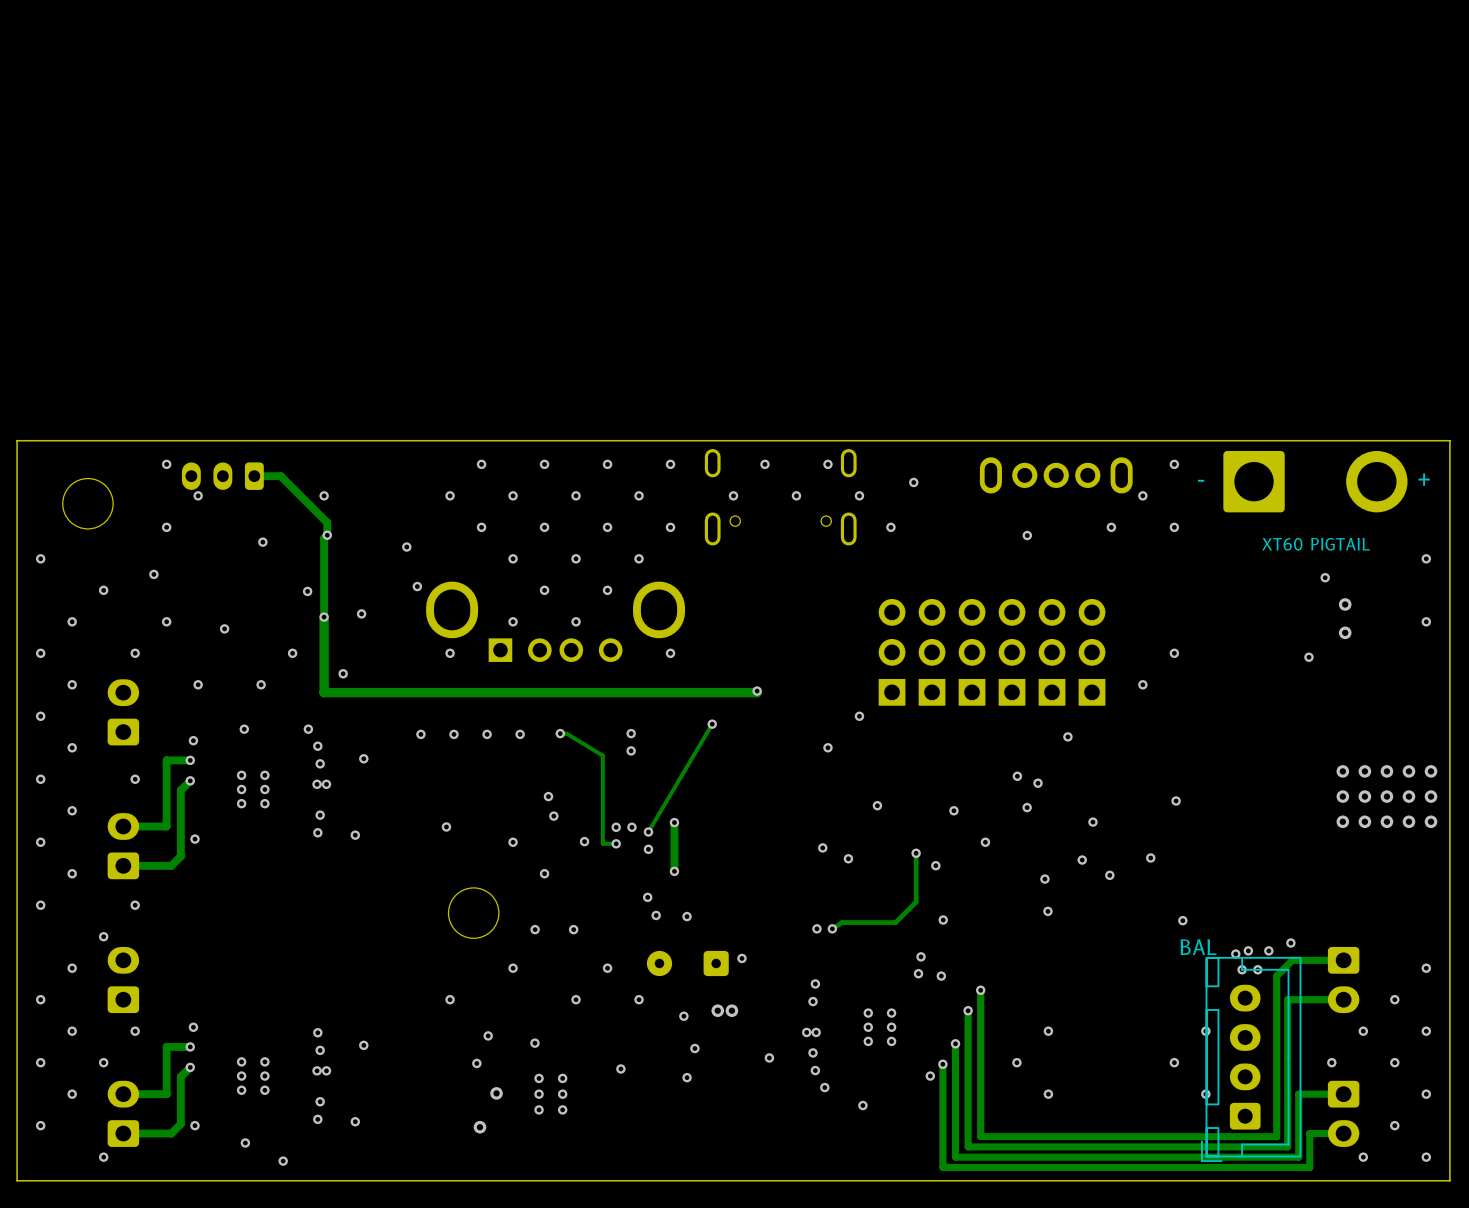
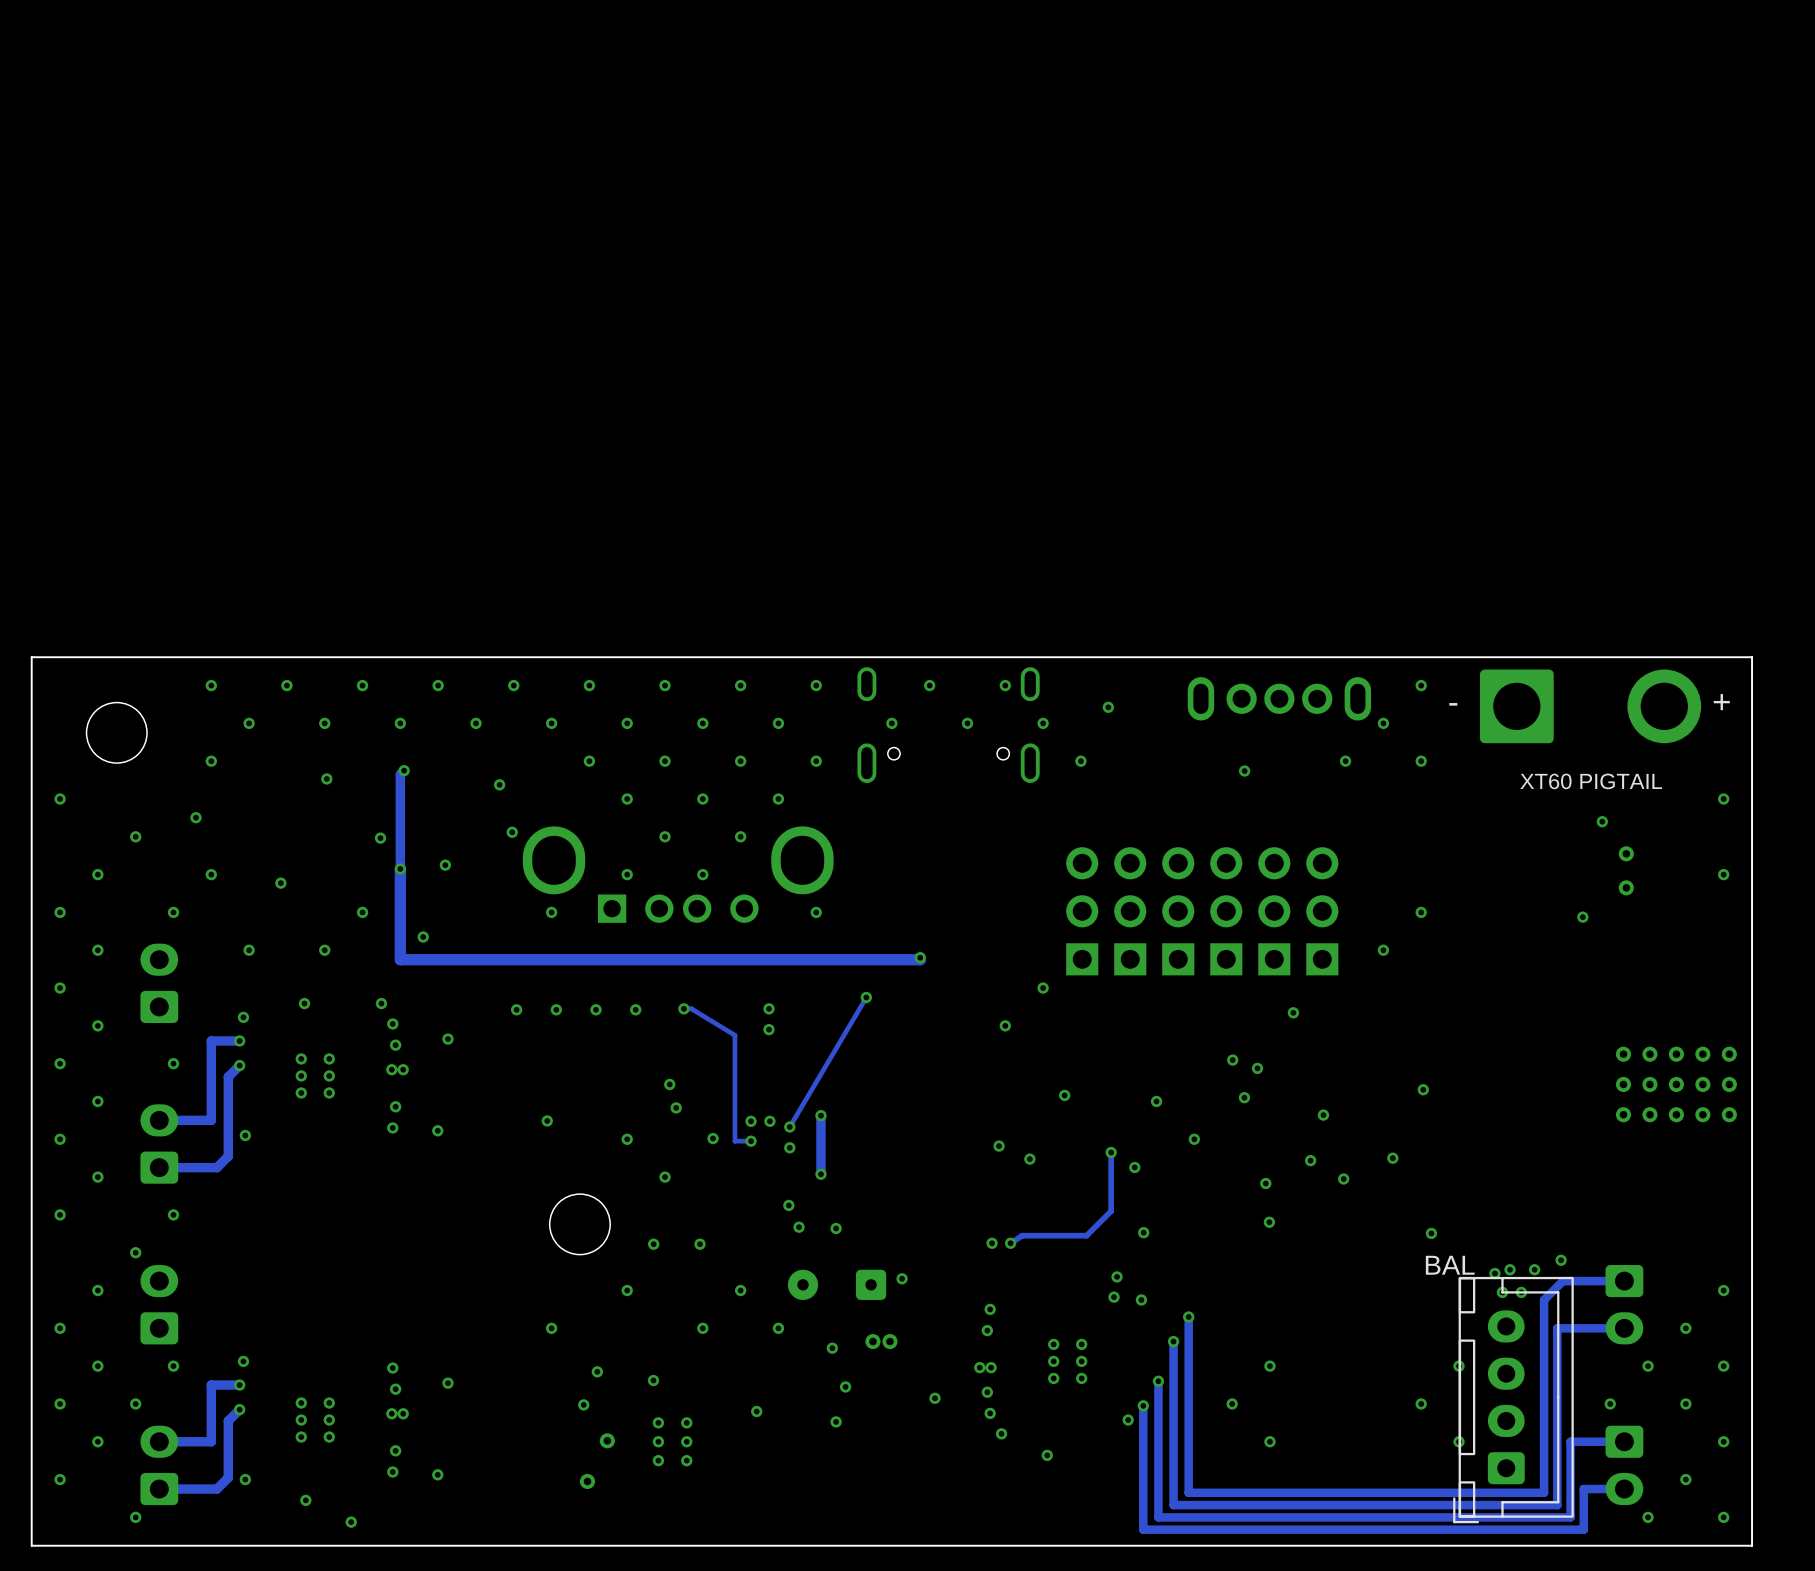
via: none -> (286, 685)
via: none -> (362, 685)
via: none -> (438, 685)
via: none -> (513, 685)
part: (222, 476) -> none
track: (254, 476) (280, 476) (327, 522) (327, 535) -> none
via: none -> (324, 723)
via: none -> (475, 723)

